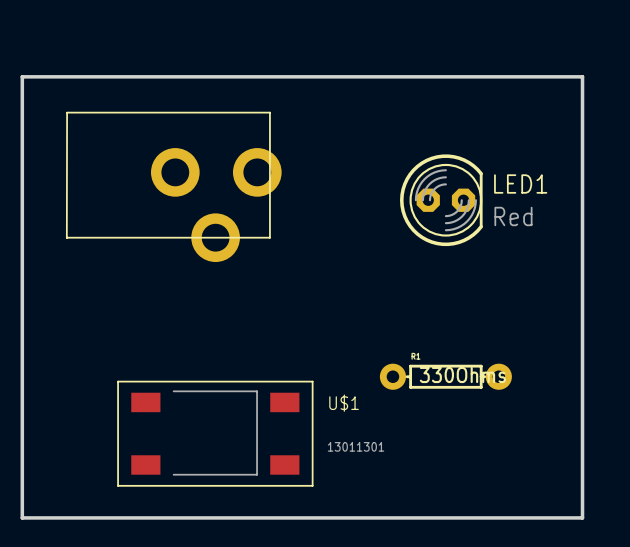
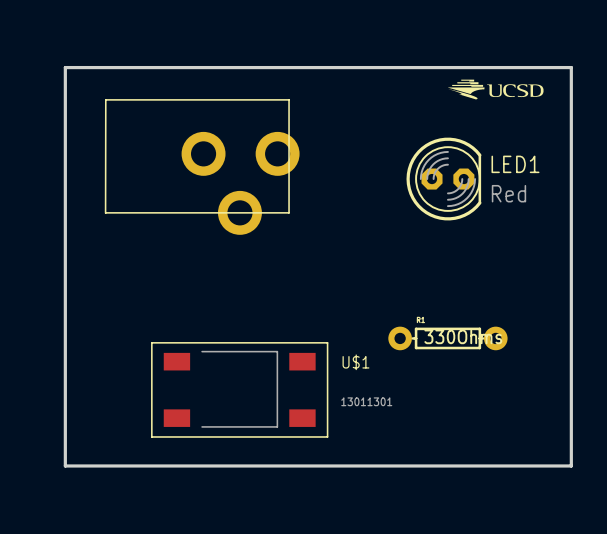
drawing: none -> [448, 79, 544, 100]

